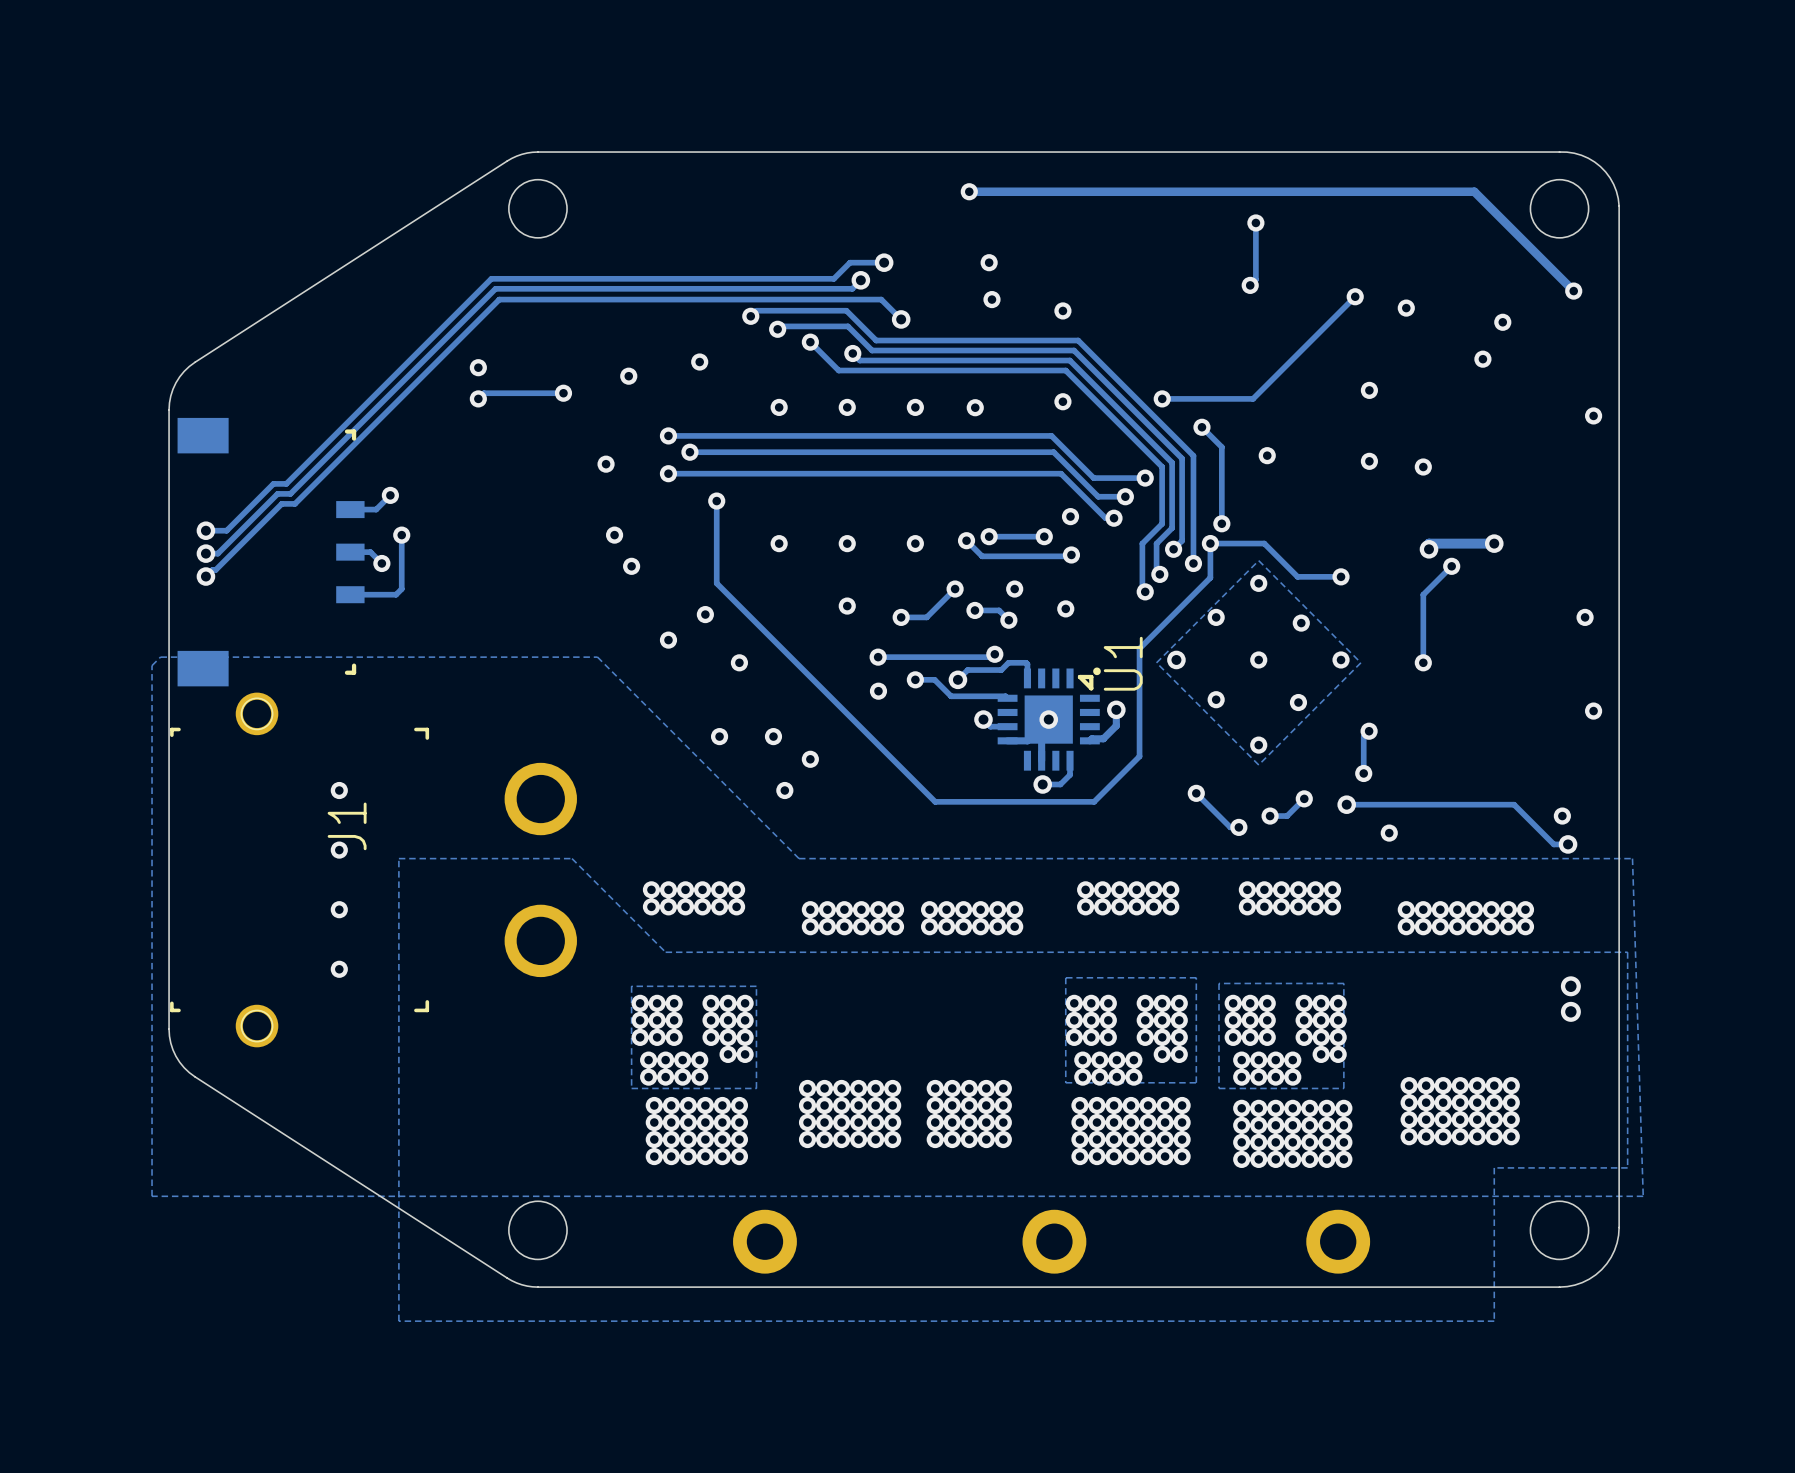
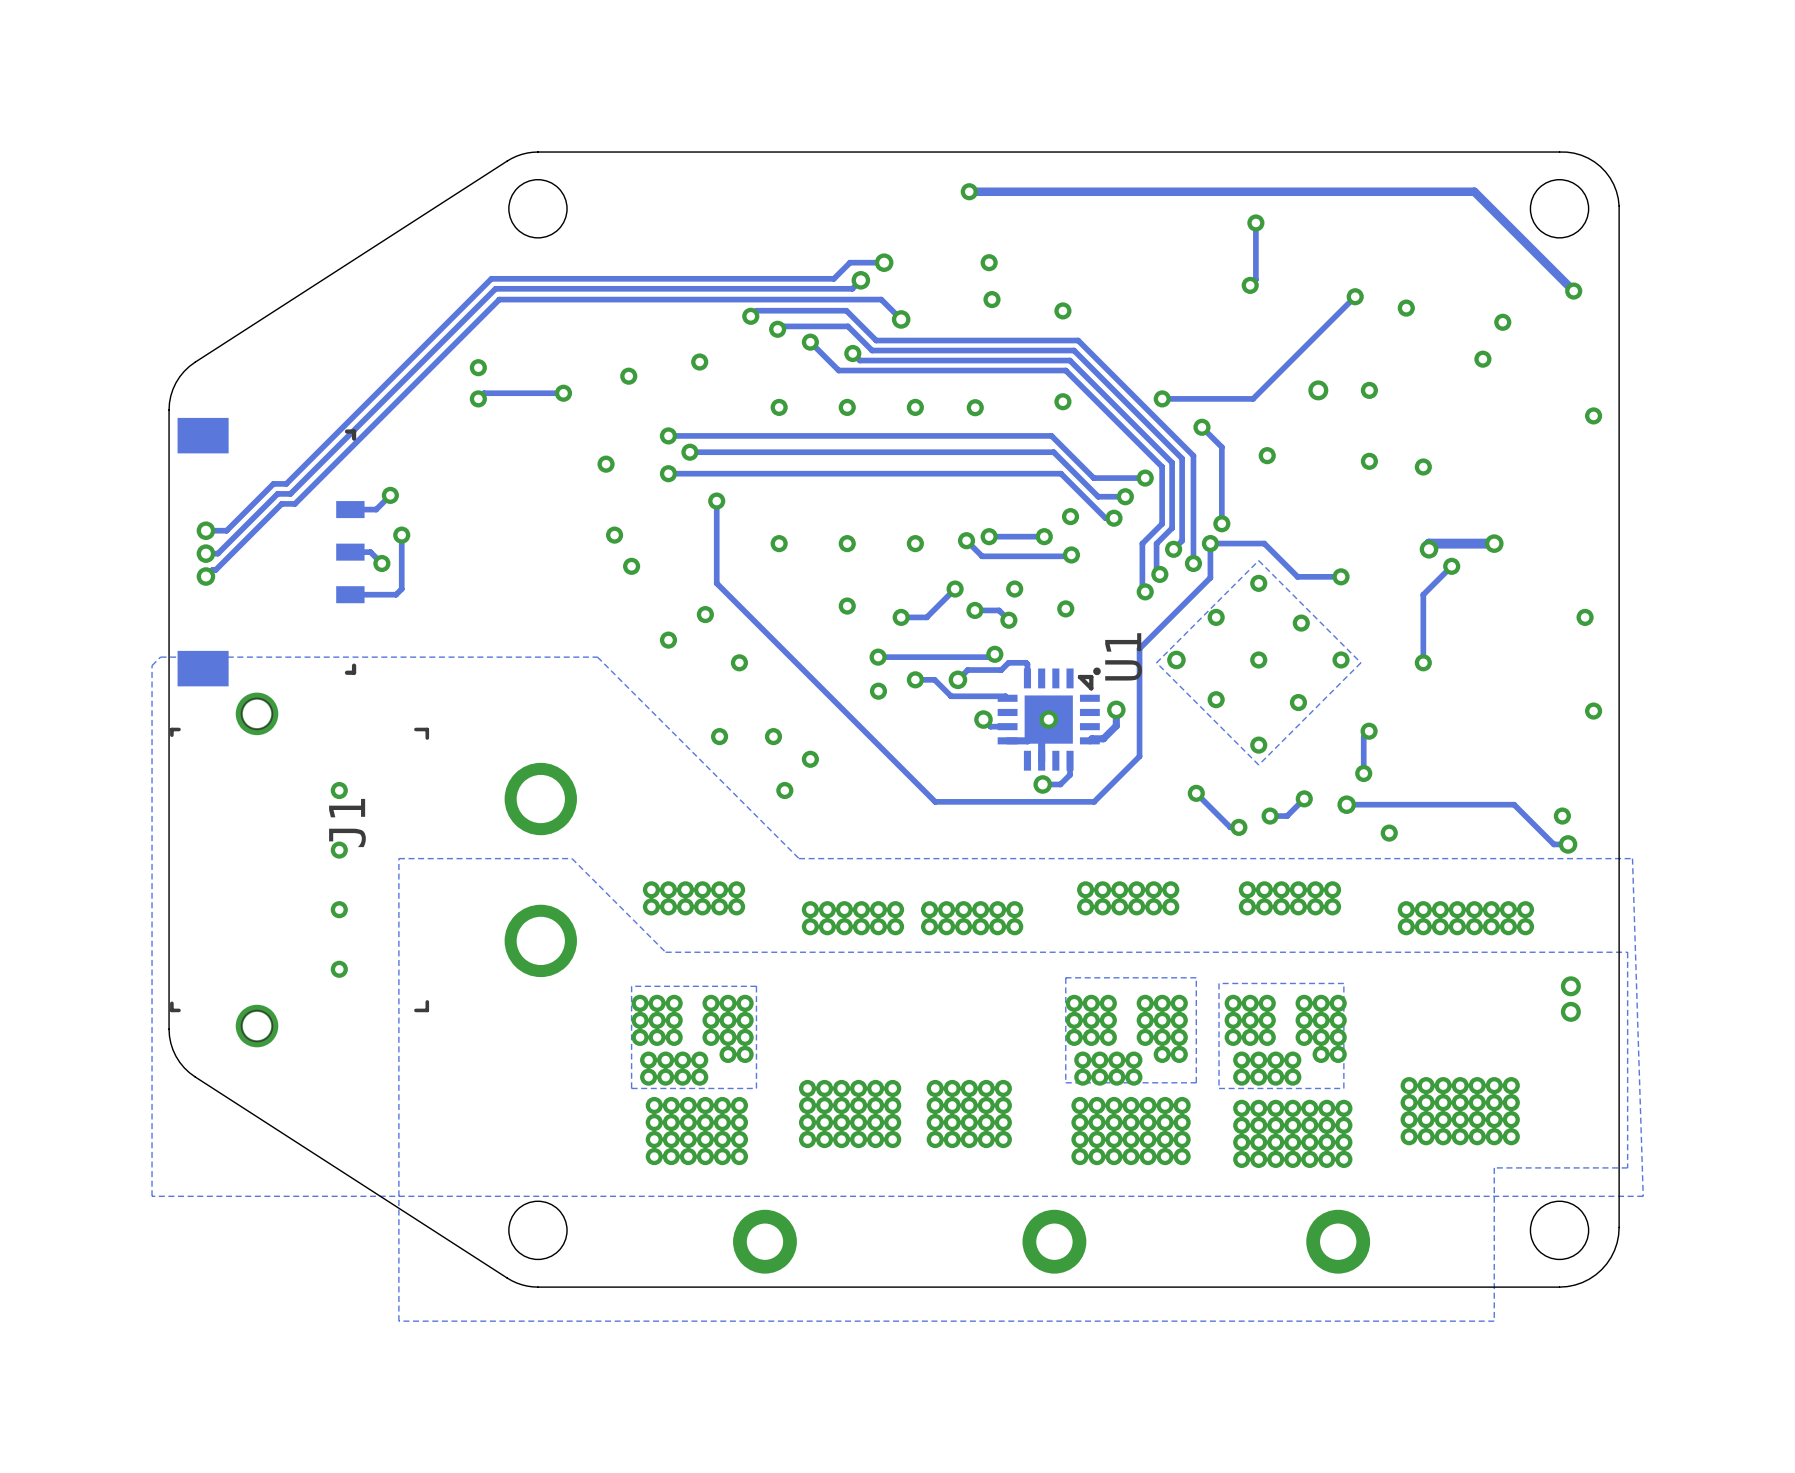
via: none -> (1318, 390)

